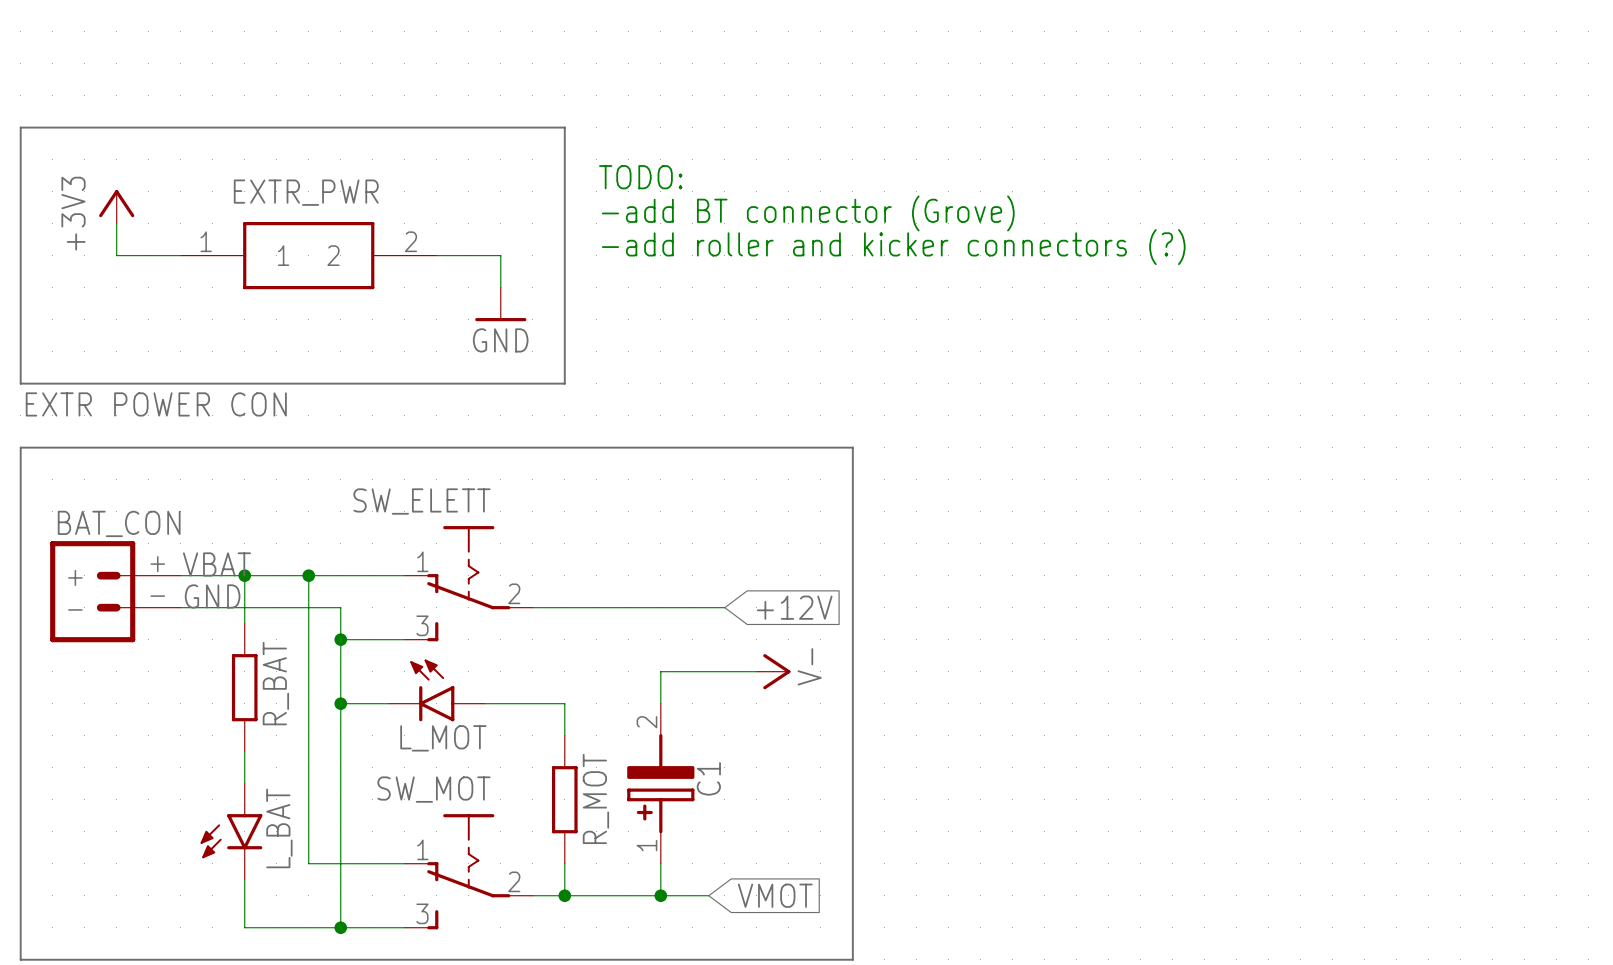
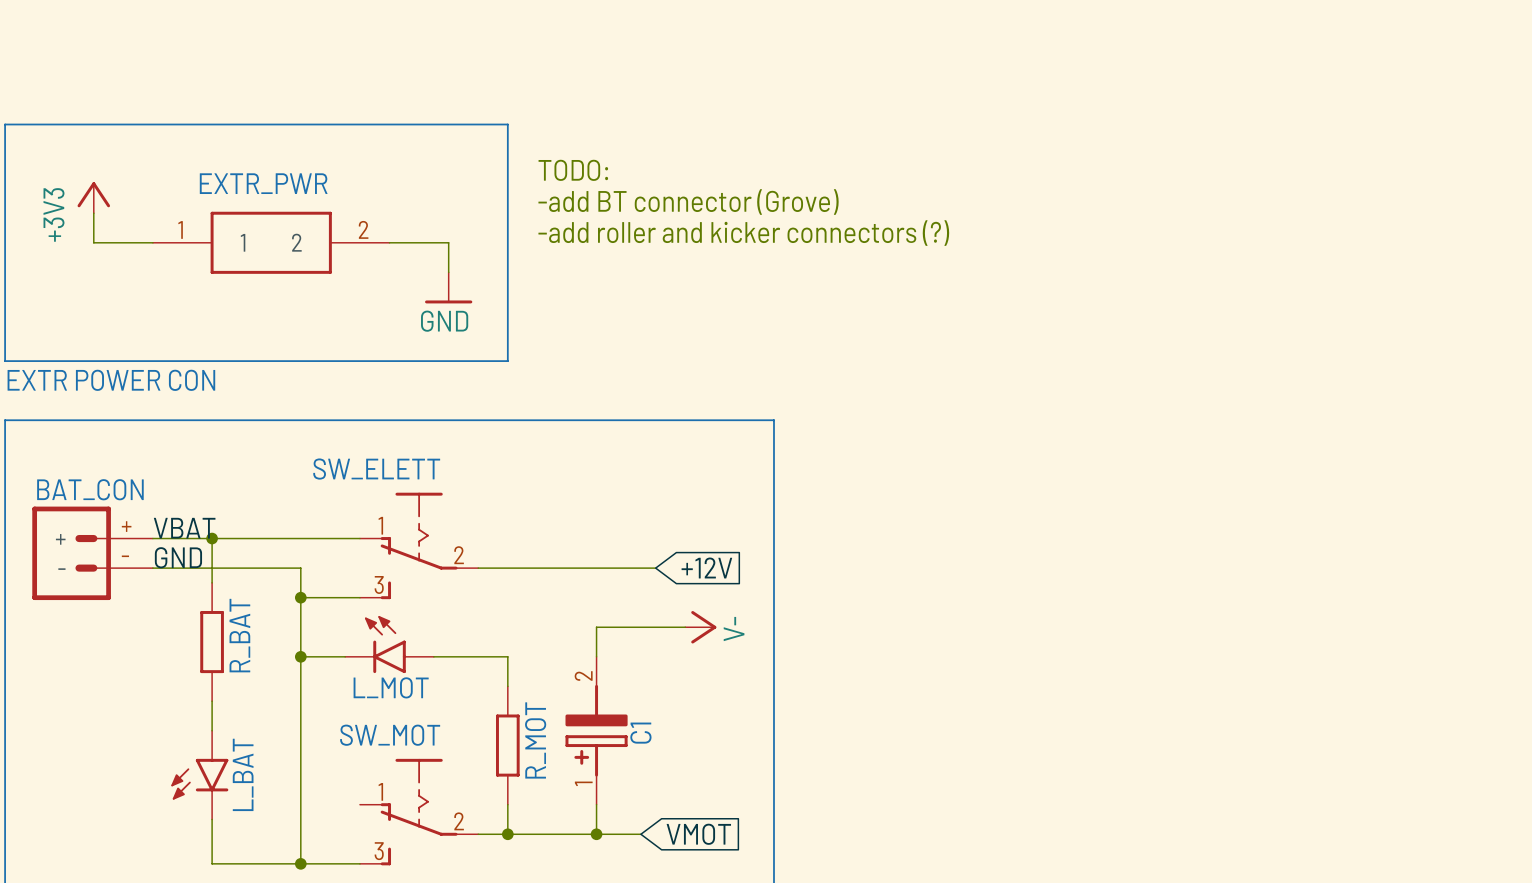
wire: (308, 575) (308, 863) (404, 863) -> none
junction: (308, 575) -> none

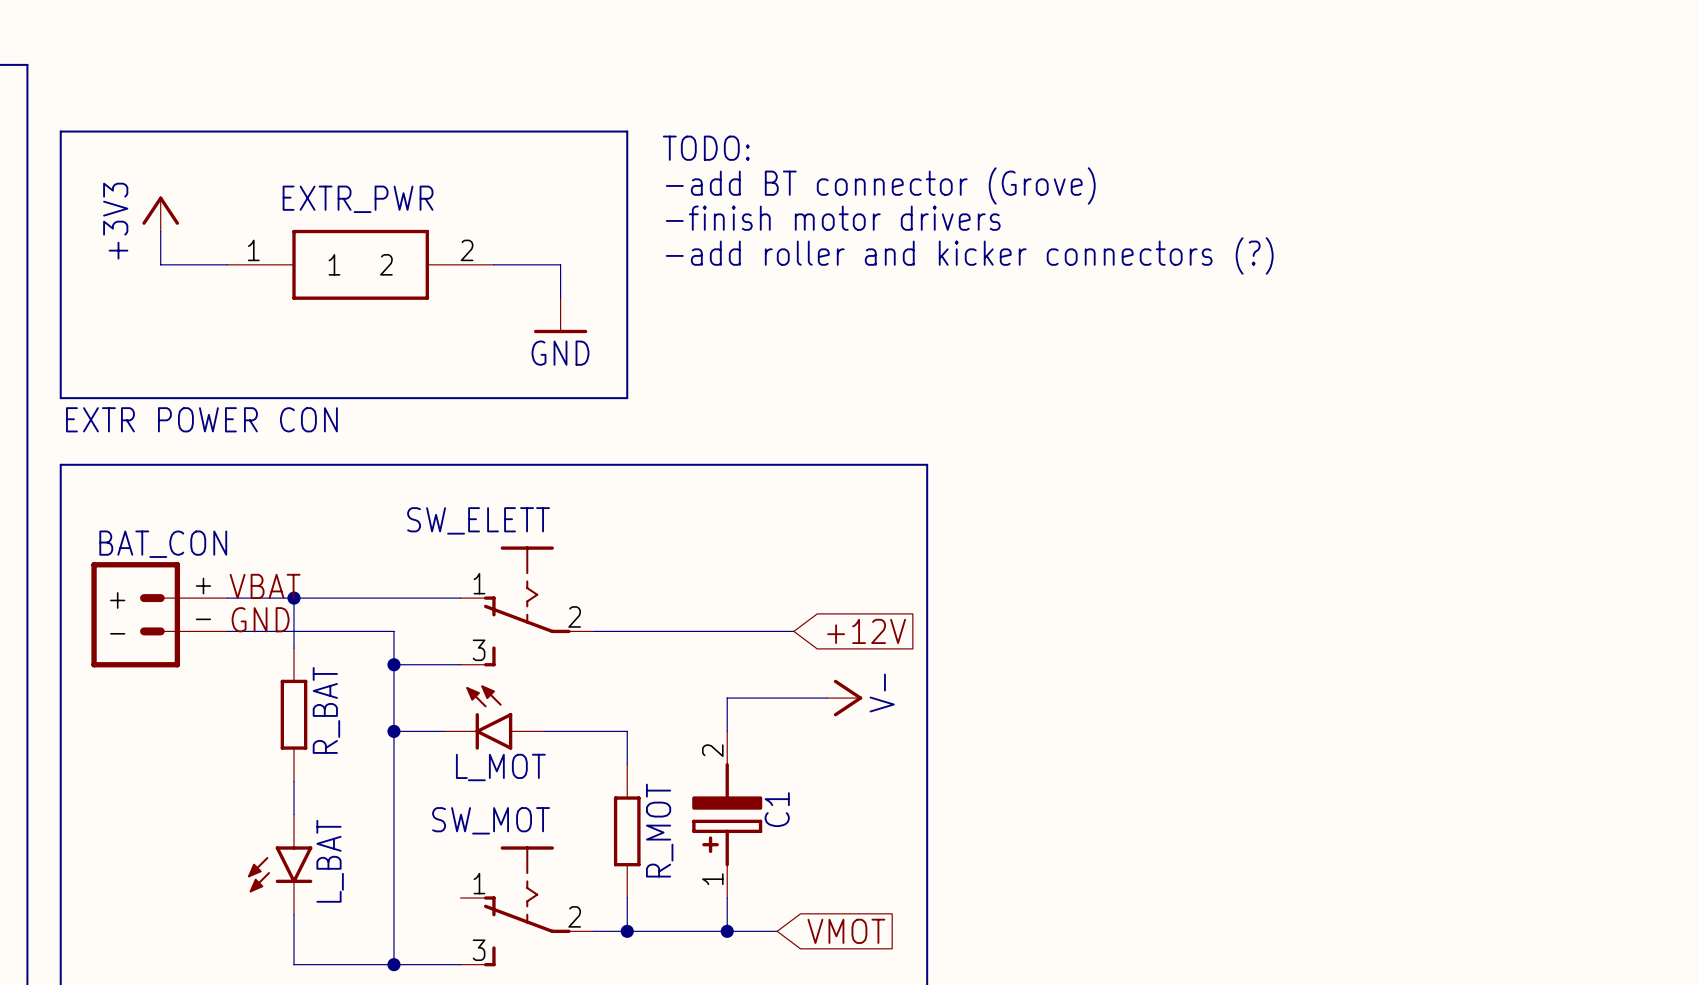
text: none -> TODO: (706, 148)
text: TODO: (573, 170) -> -add BT connector (Grove) (880, 185)
text: -add BT connector (Grove) (688, 202) -> -finish motor drivers (833, 218)

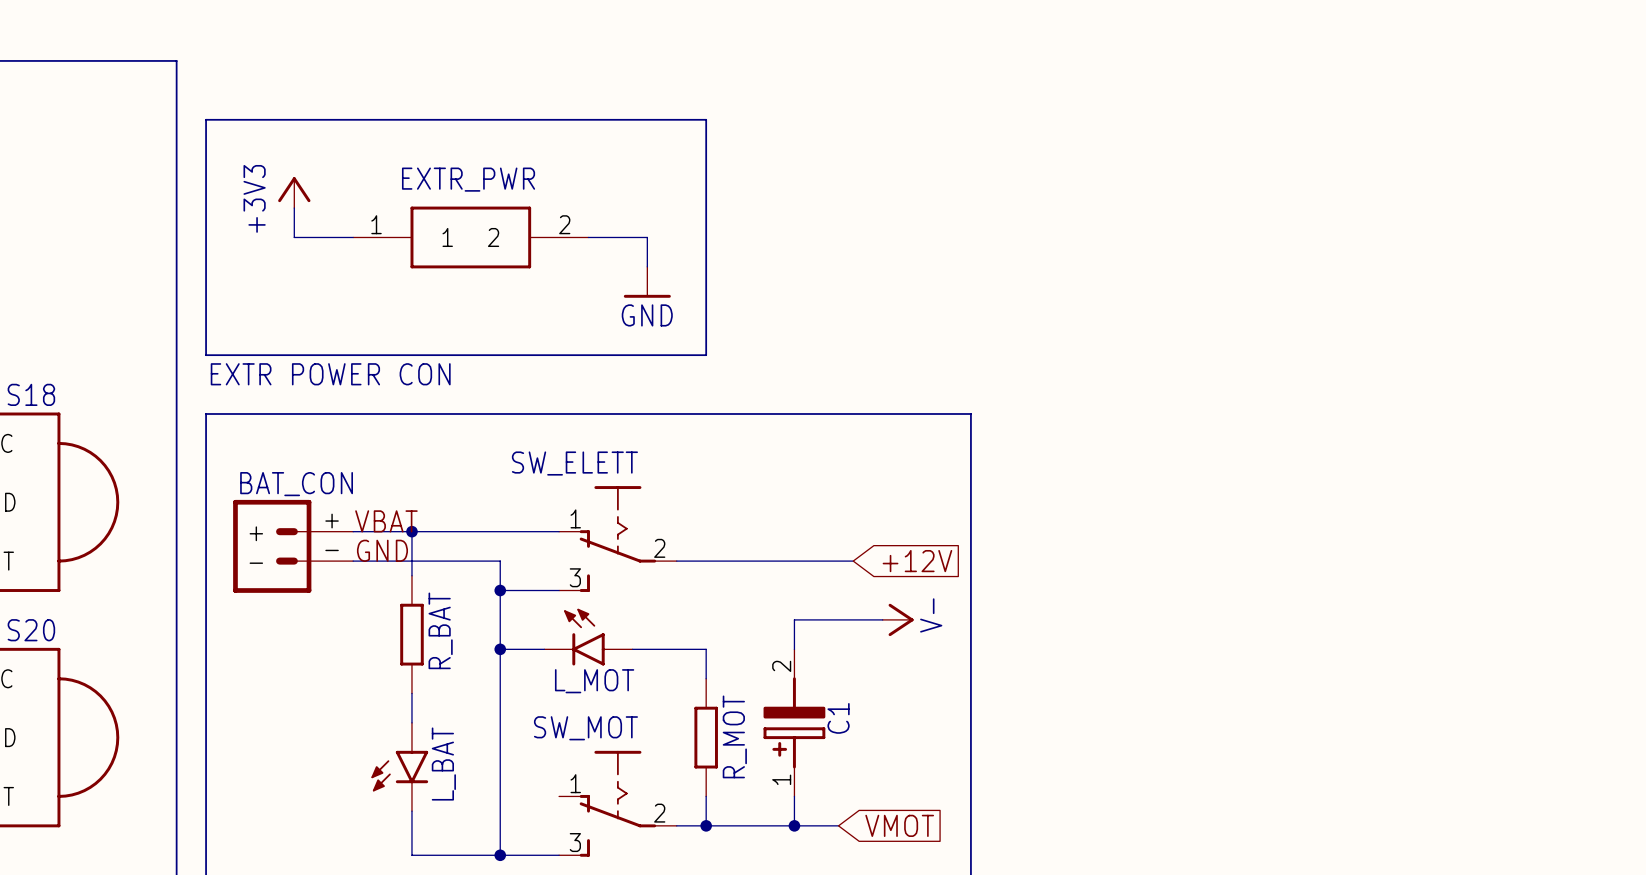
text: TODO: (706, 148) -> none
text: -add BT connector (Grove) (880, 185) -> none
text: -finish motor drivers (833, 218) -> none
text: -add roller and kicker connectors (?) (969, 255) -> none

